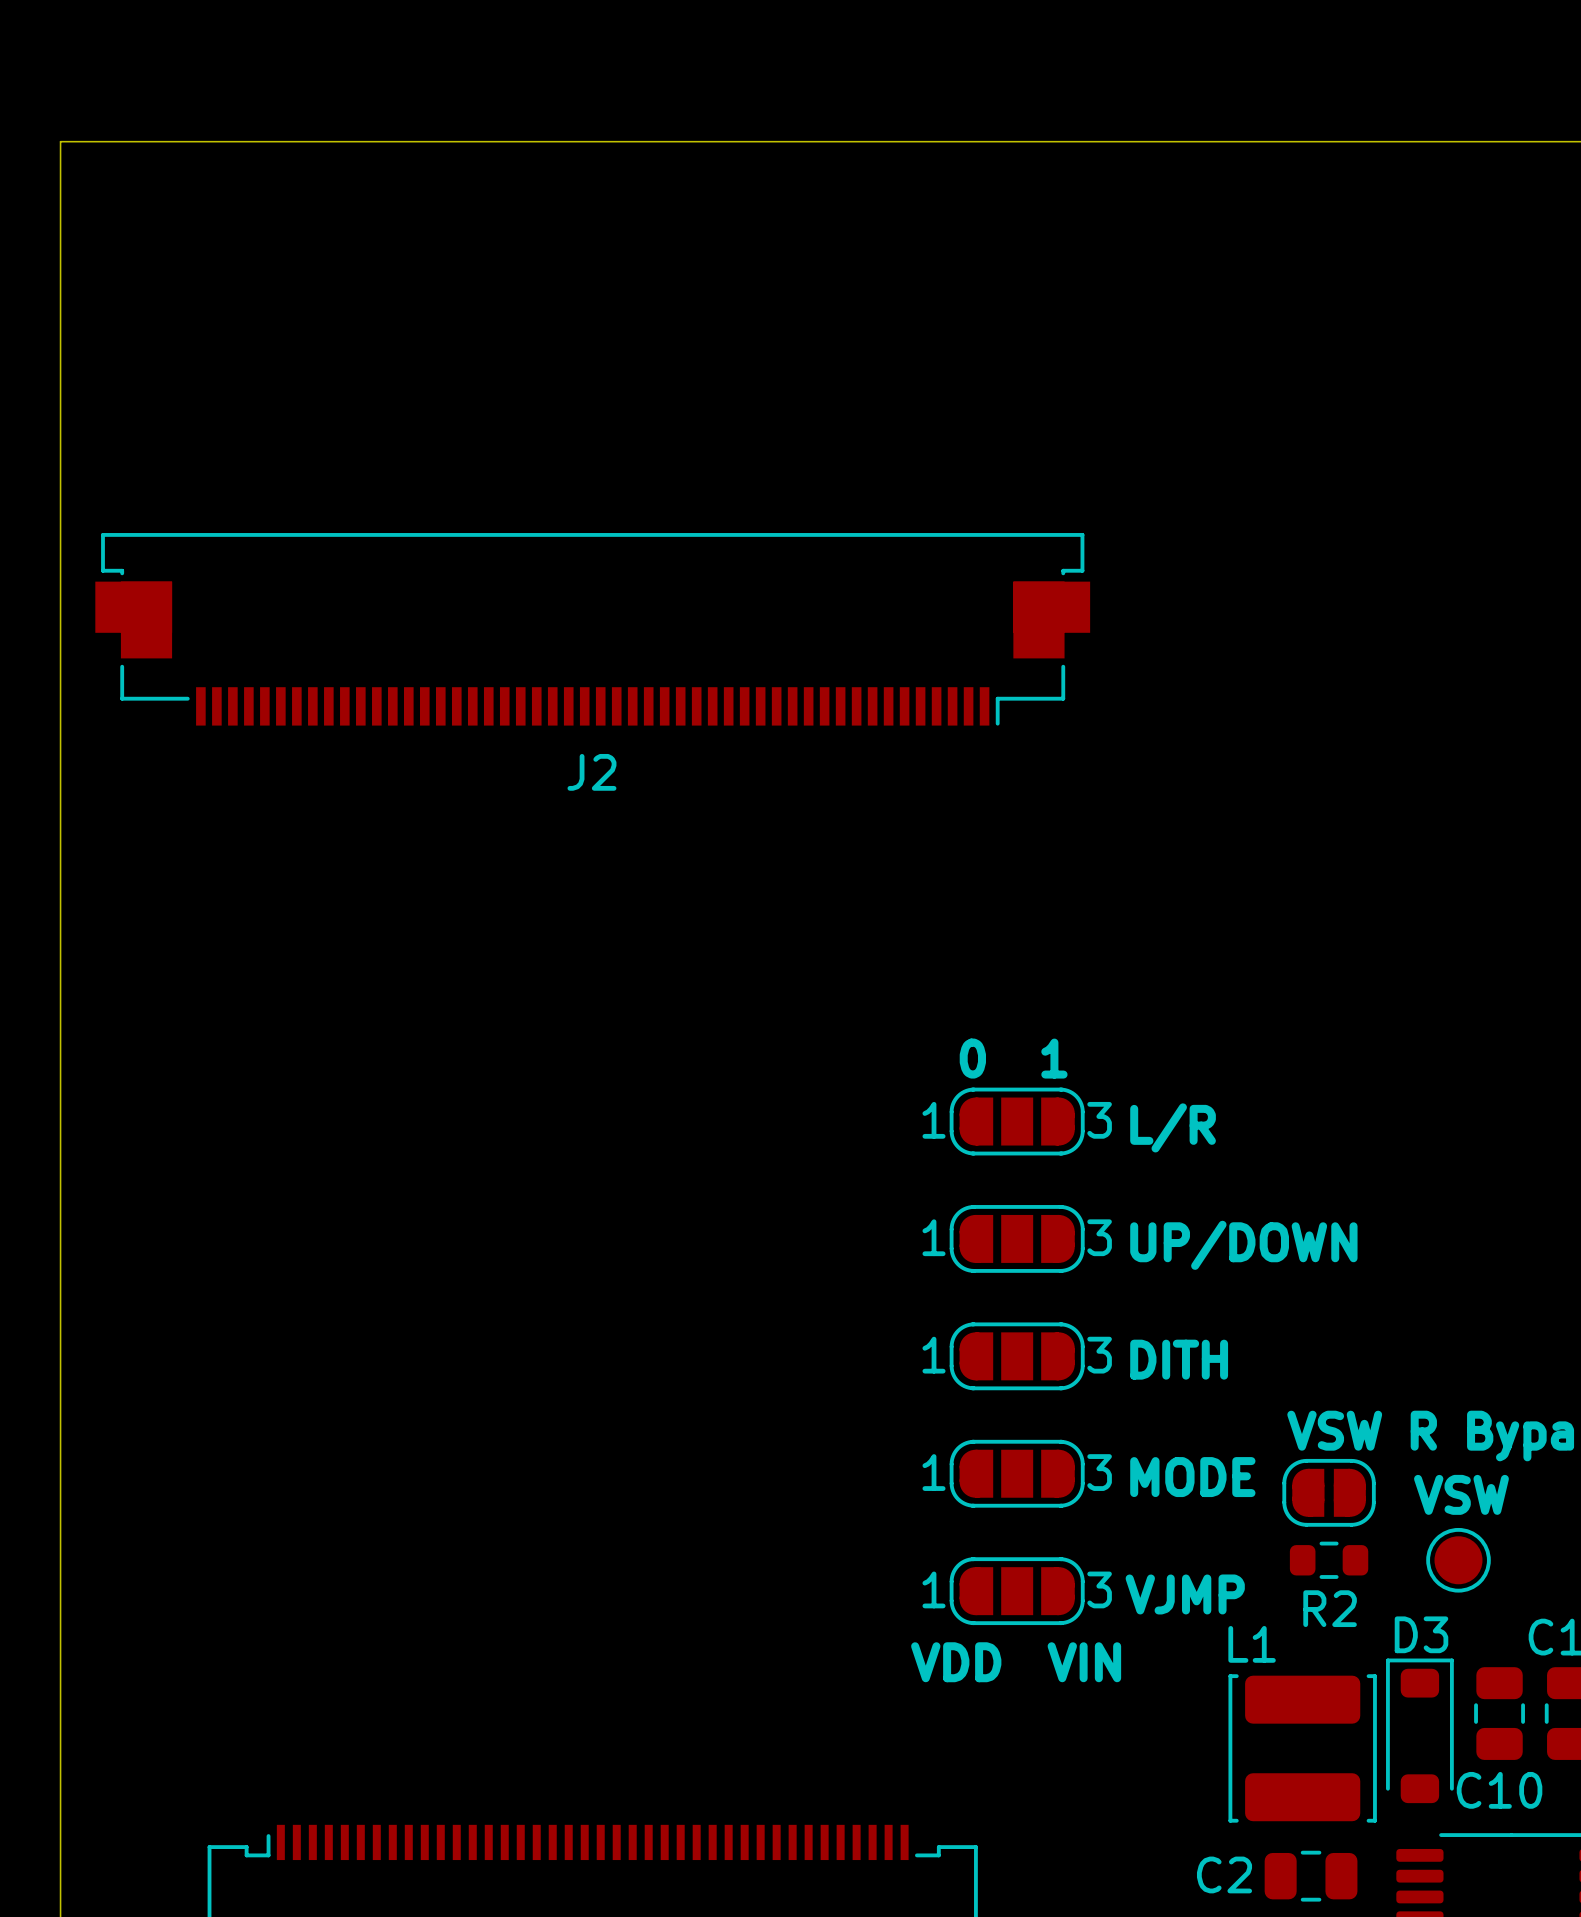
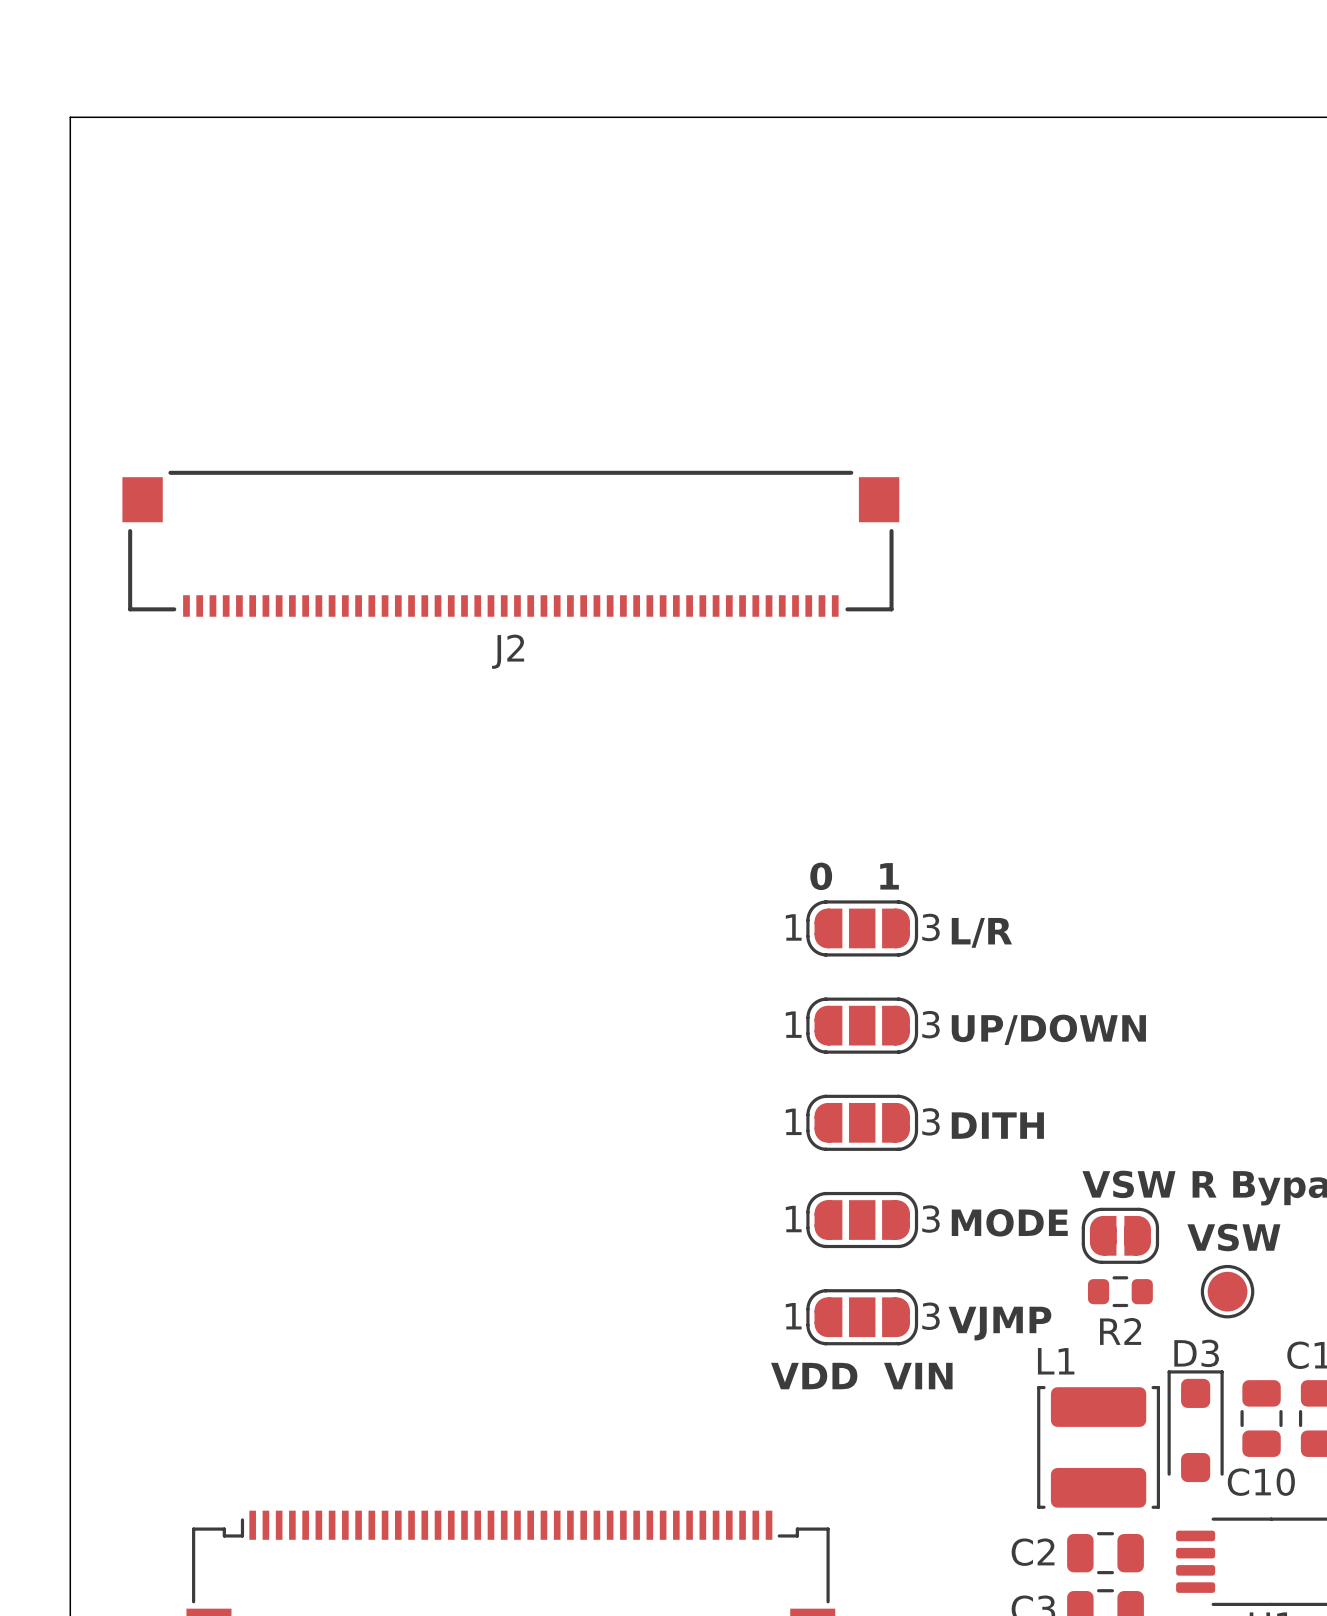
J2 footprint: [95, 533, 1091, 726] -> [122, 470, 900, 617]
D3 footprint: [1386, 1658, 1454, 1804] -> [1167, 1370, 1224, 1483]

